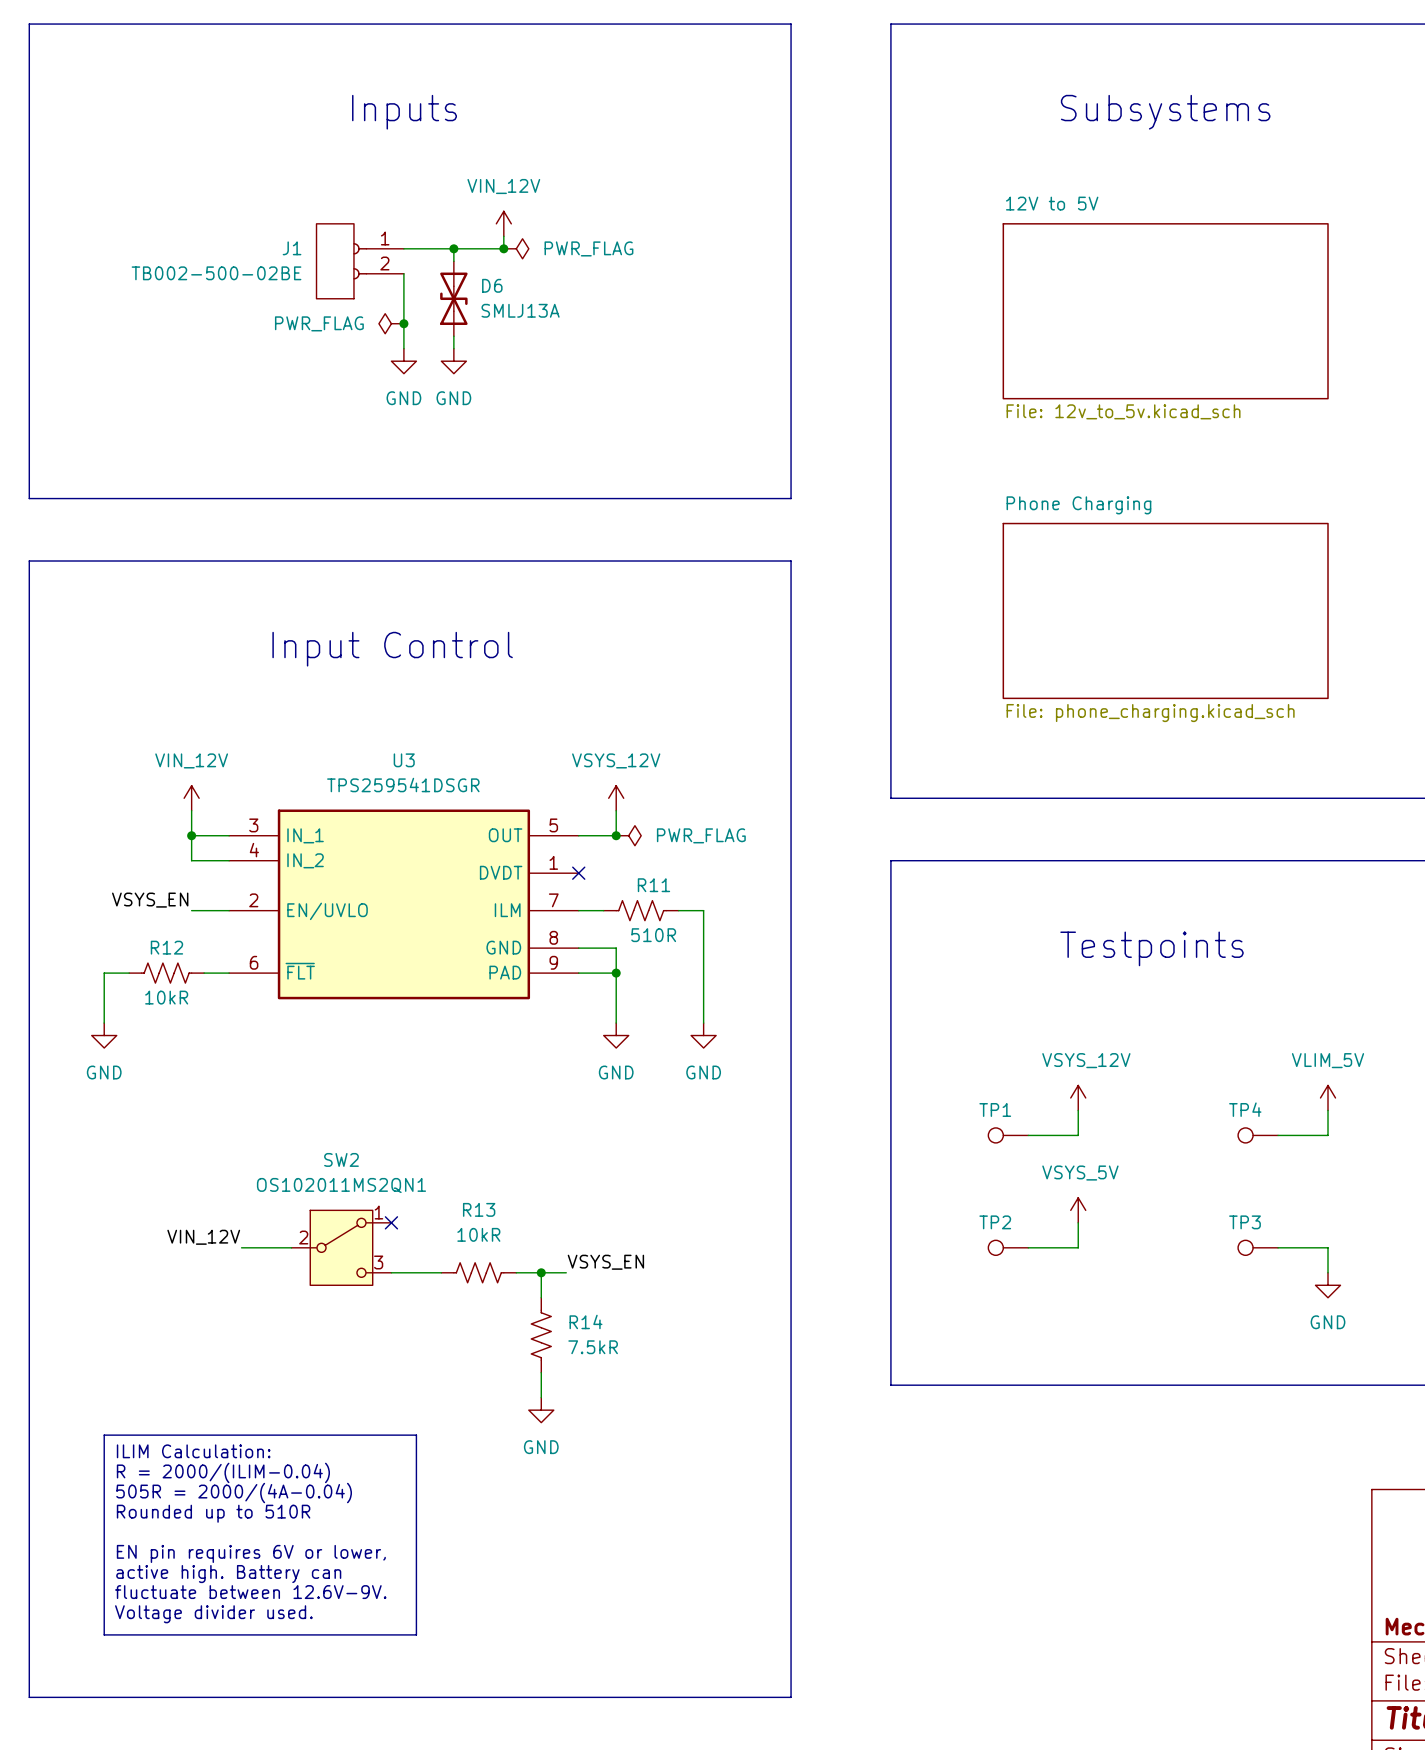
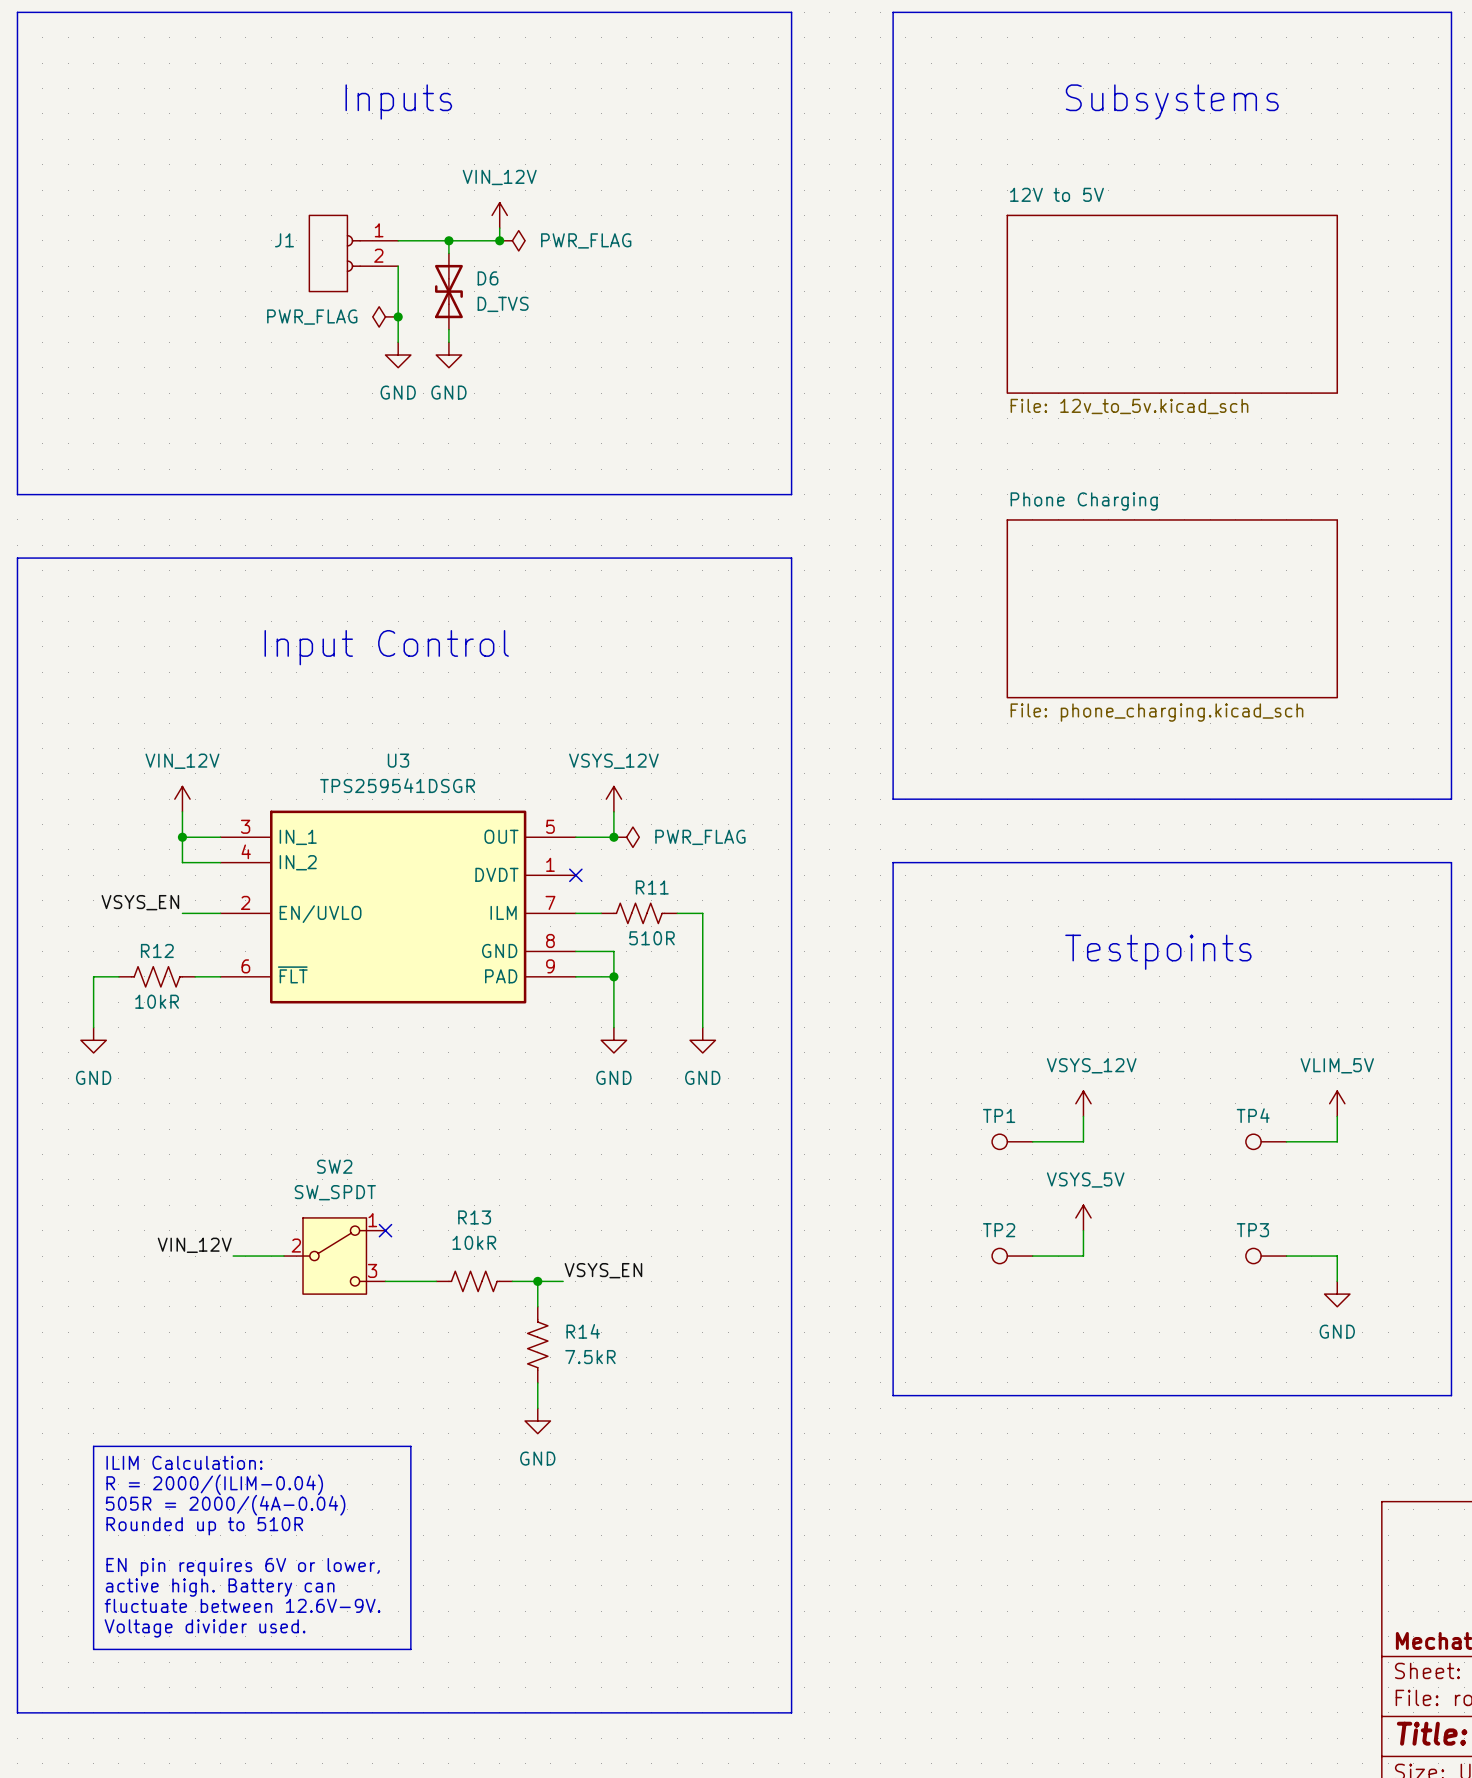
J1 value: TB002-500-02BE (216, 273) -> none
D6 value: SMLJ13A (520, 310) -> D_TVS (503, 304)
SW2 value: OS102011MS2QN1 (341, 1185) -> SW_SPDT (335, 1192)

